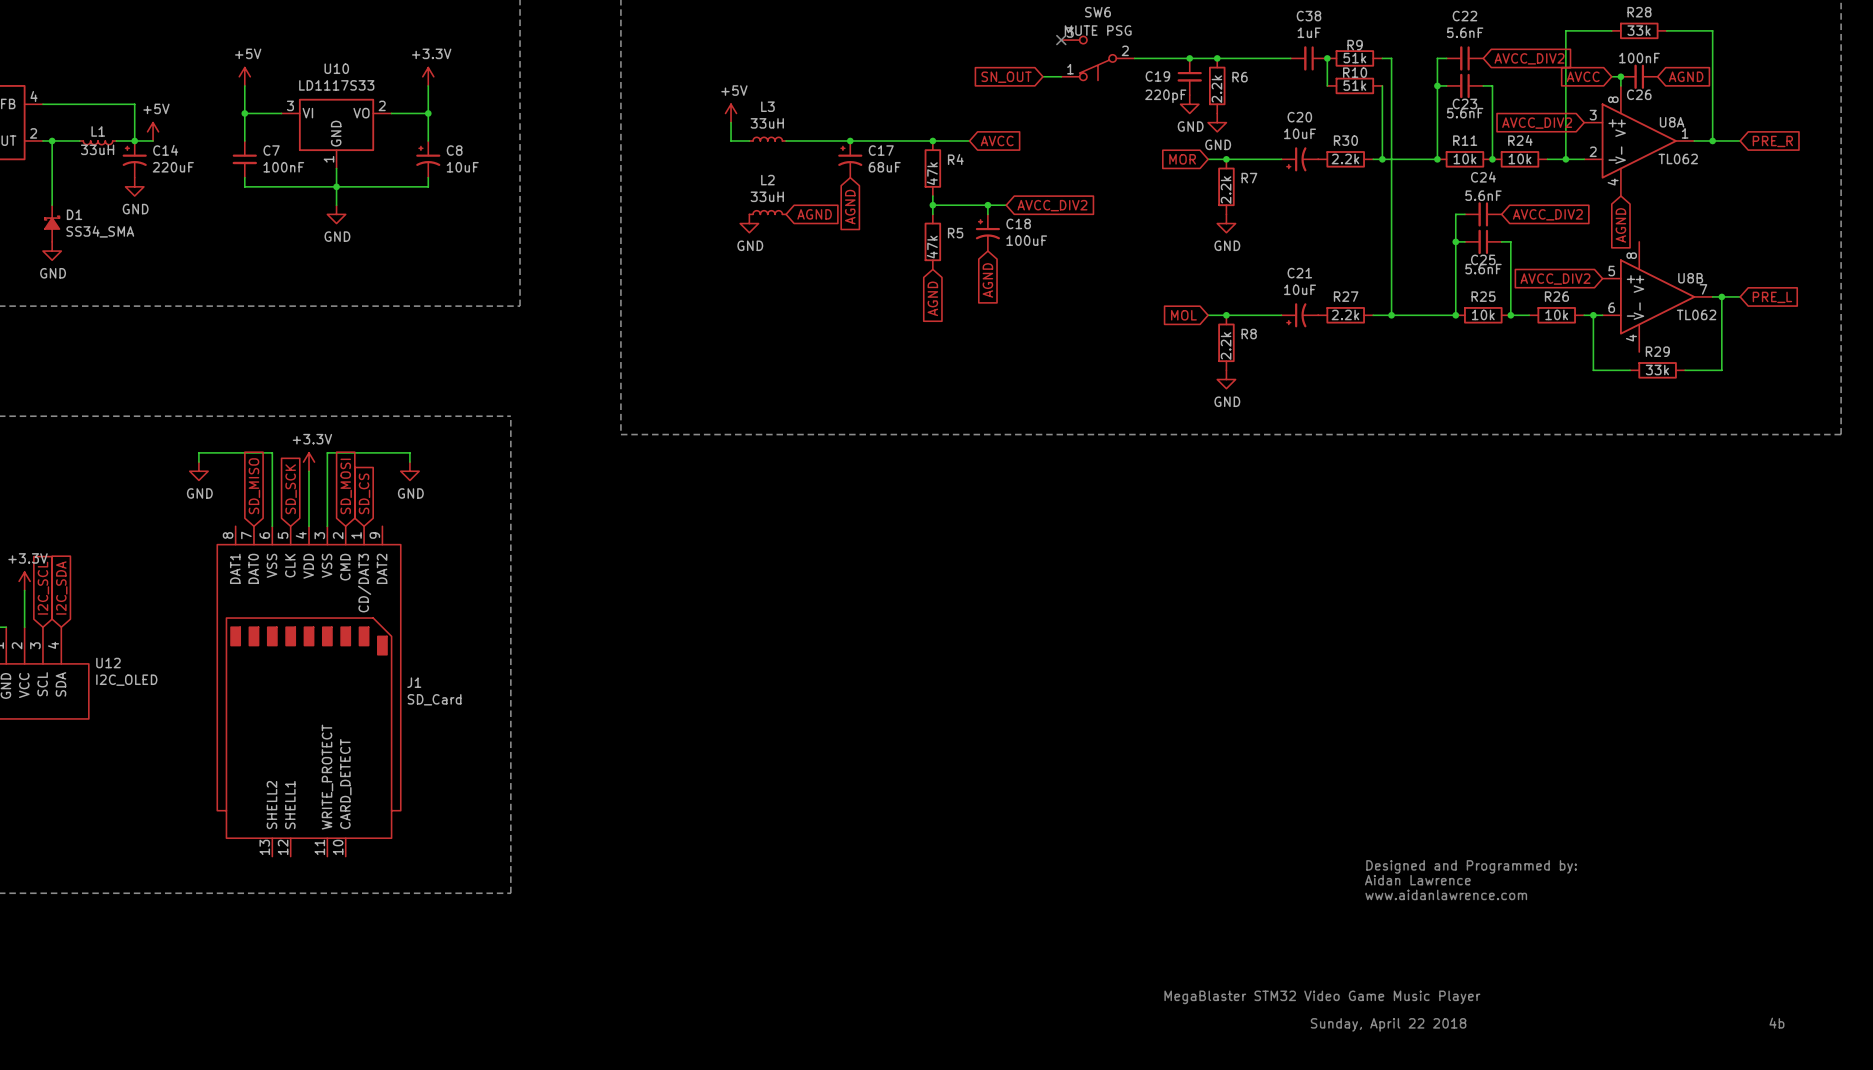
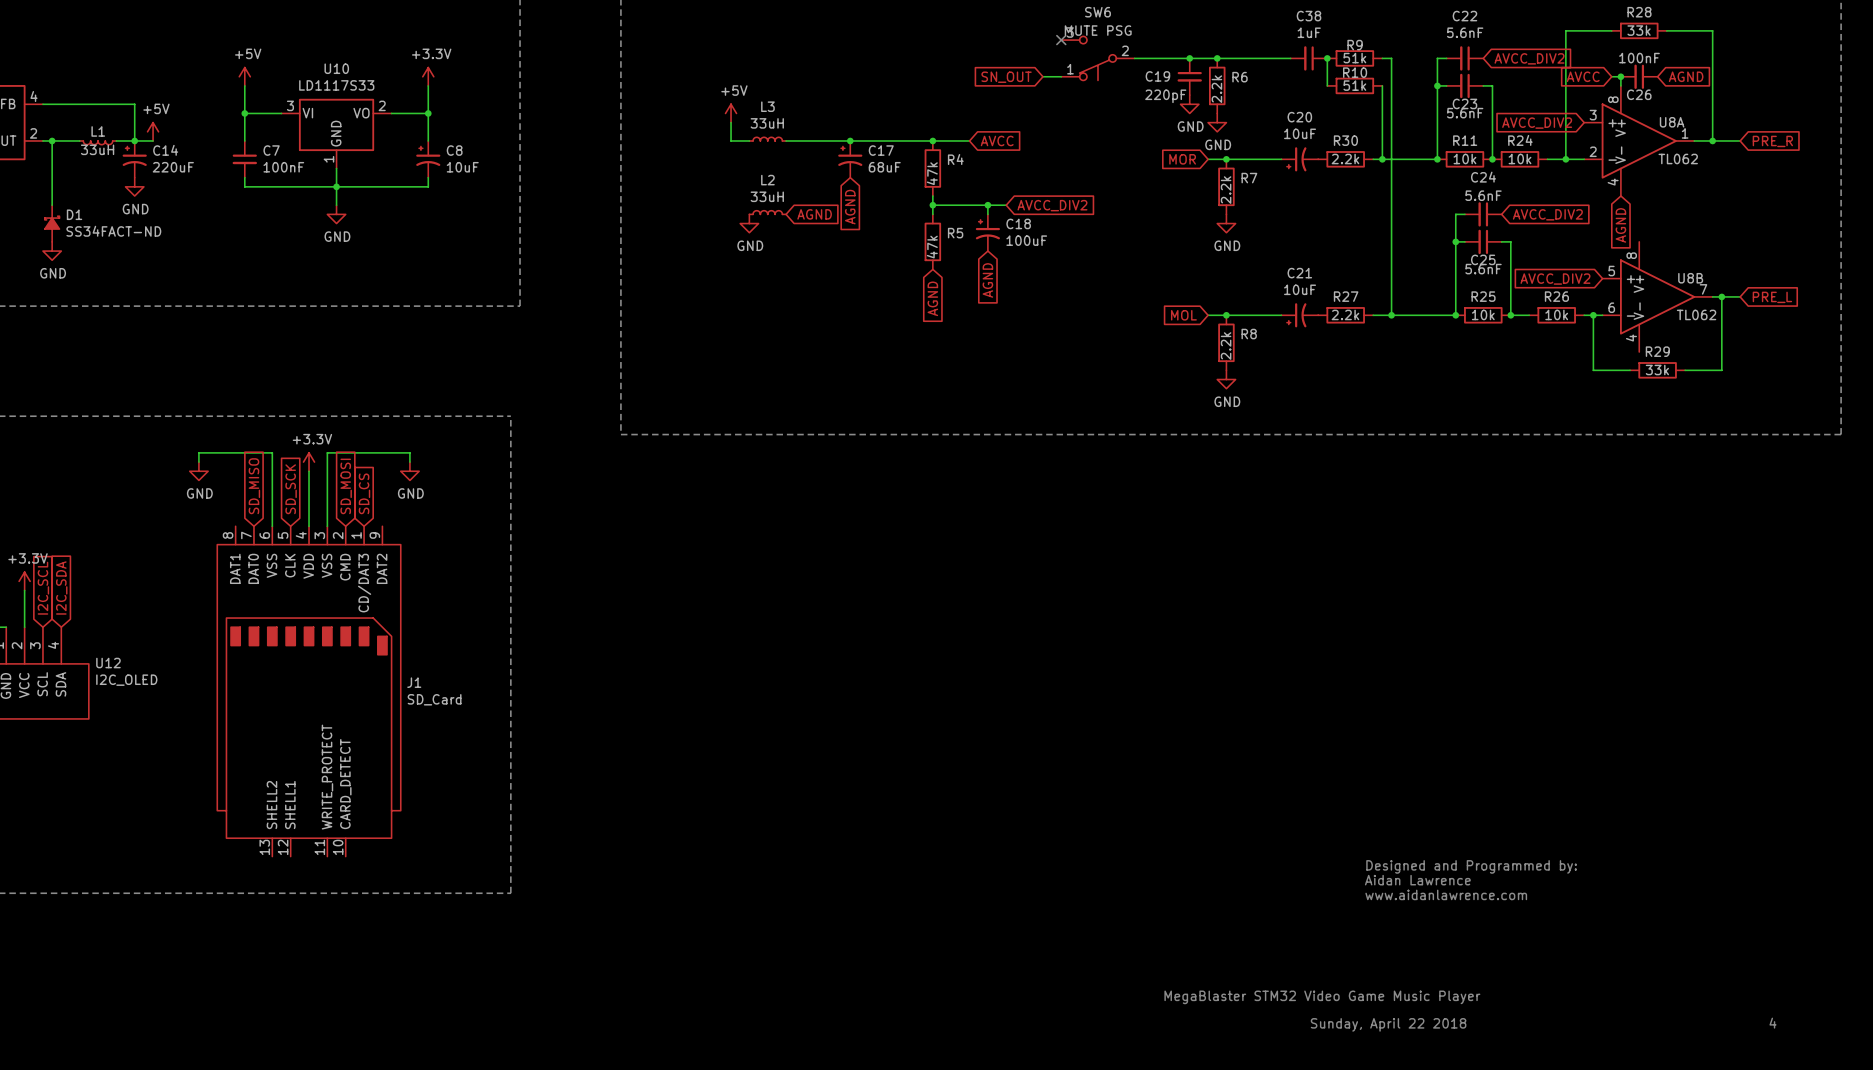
D1 value: SS34_SMA (100, 231) -> SS34FACT-ND (113, 231)
text: 4b (1776, 1023) -> 4 (1773, 1023)

